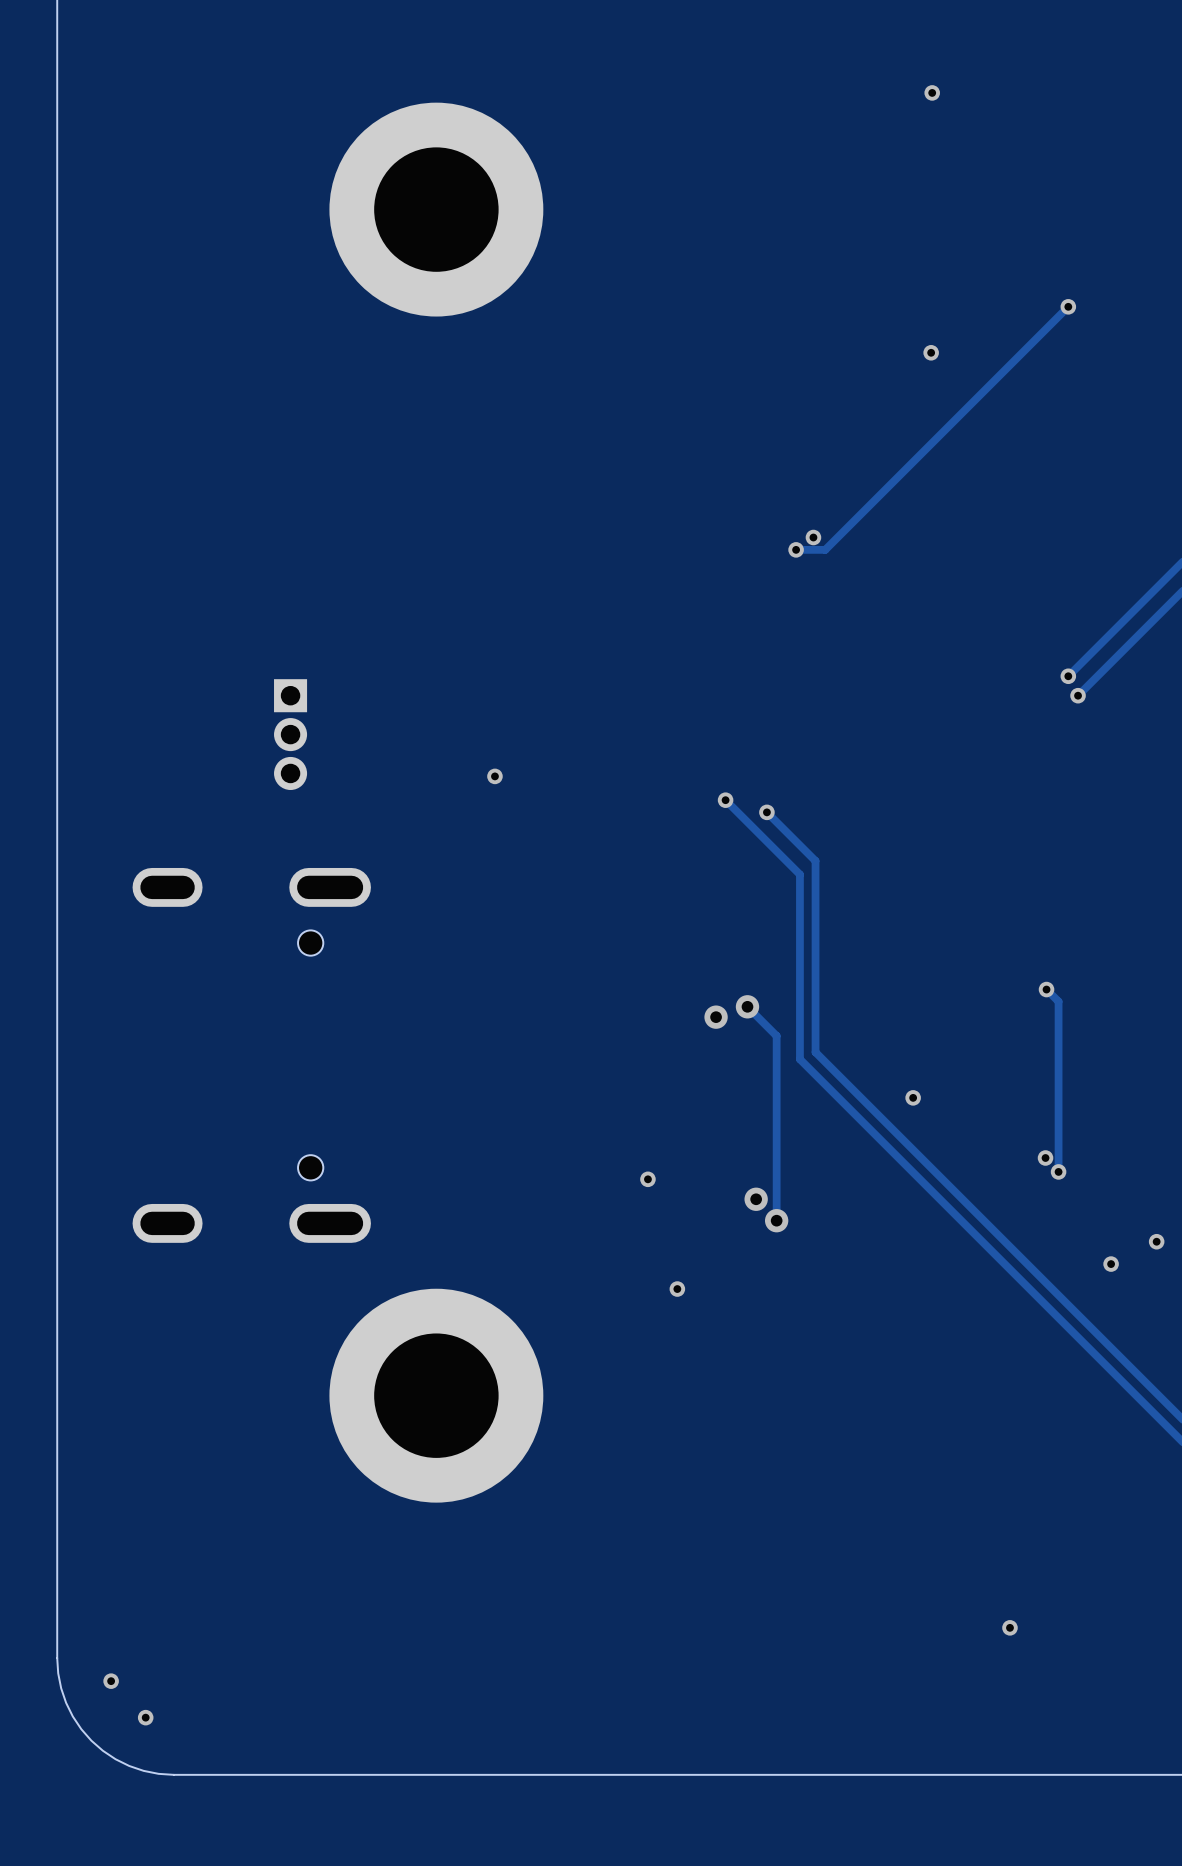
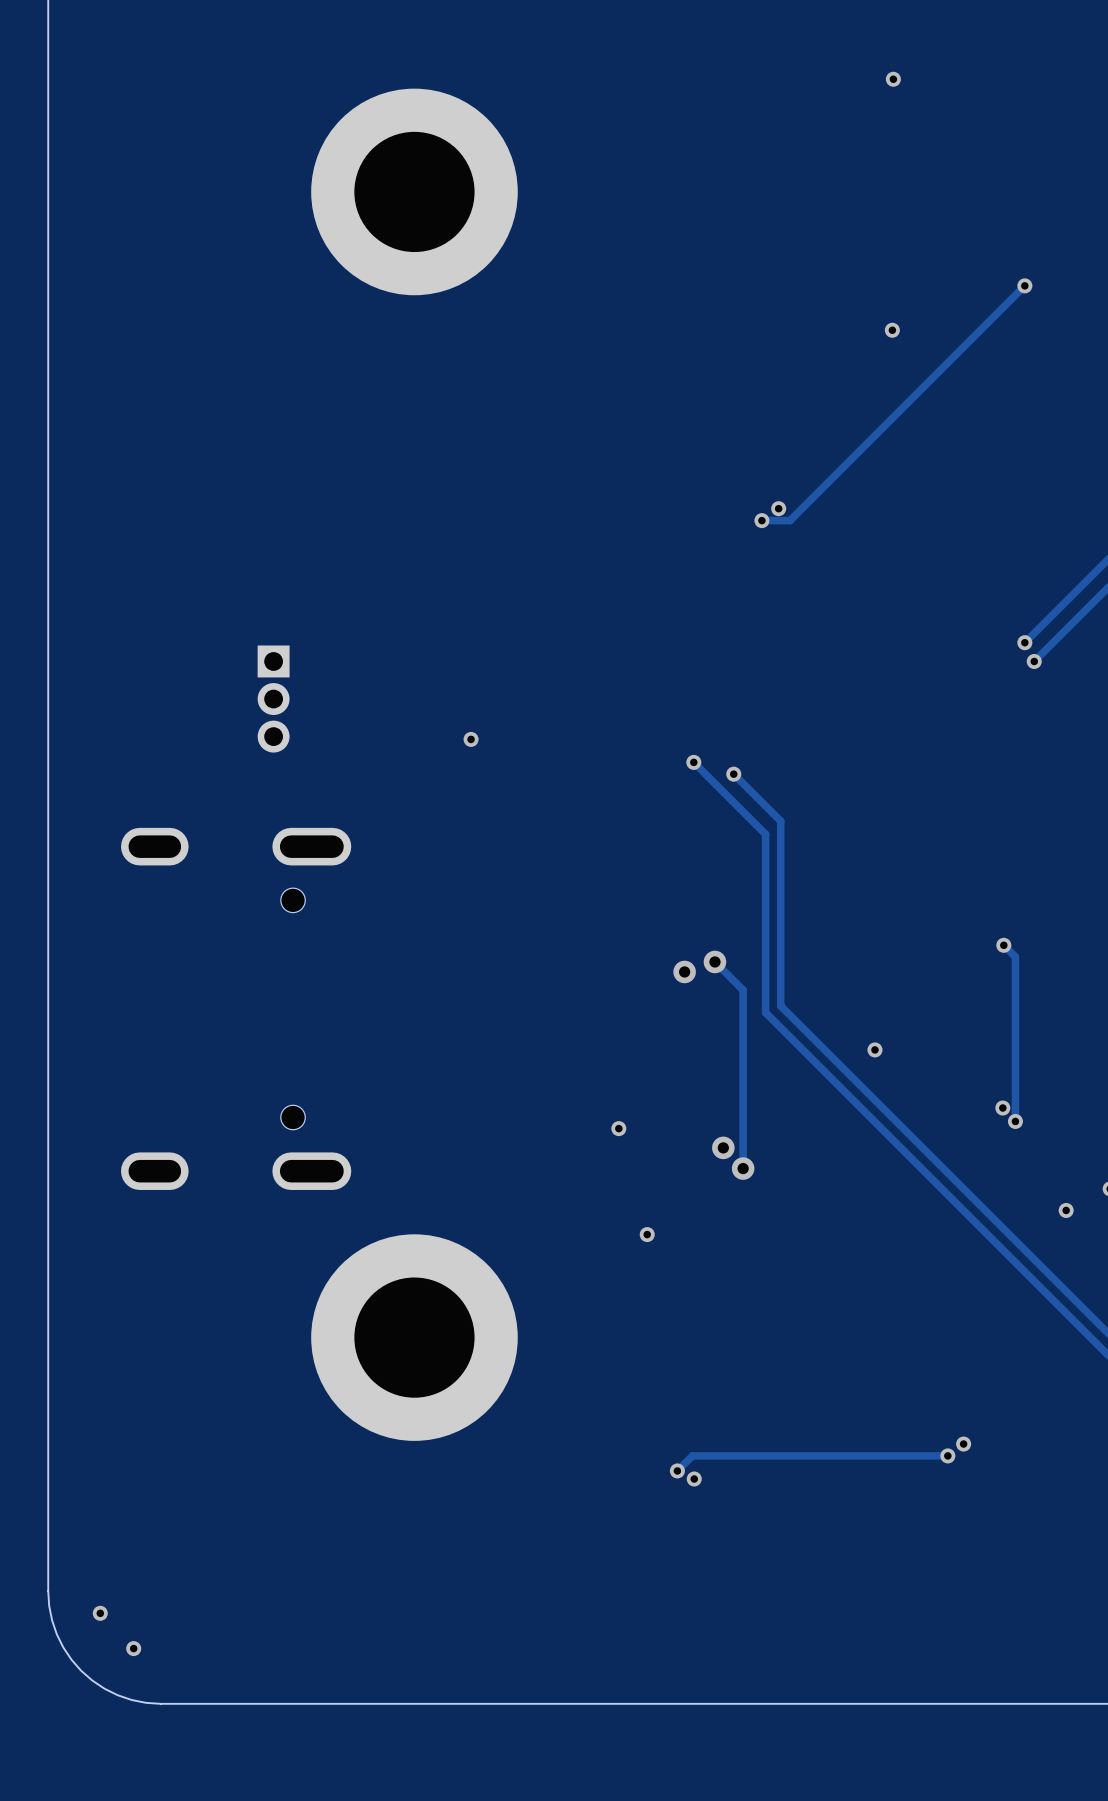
via: none -> (963, 1444)
track: none -> (947, 1455) (692, 1455) (677, 1470)
via: none -> (947, 1455)
via: none -> (677, 1470)
via: none -> (694, 1479)
via: (1009, 1627) -> none

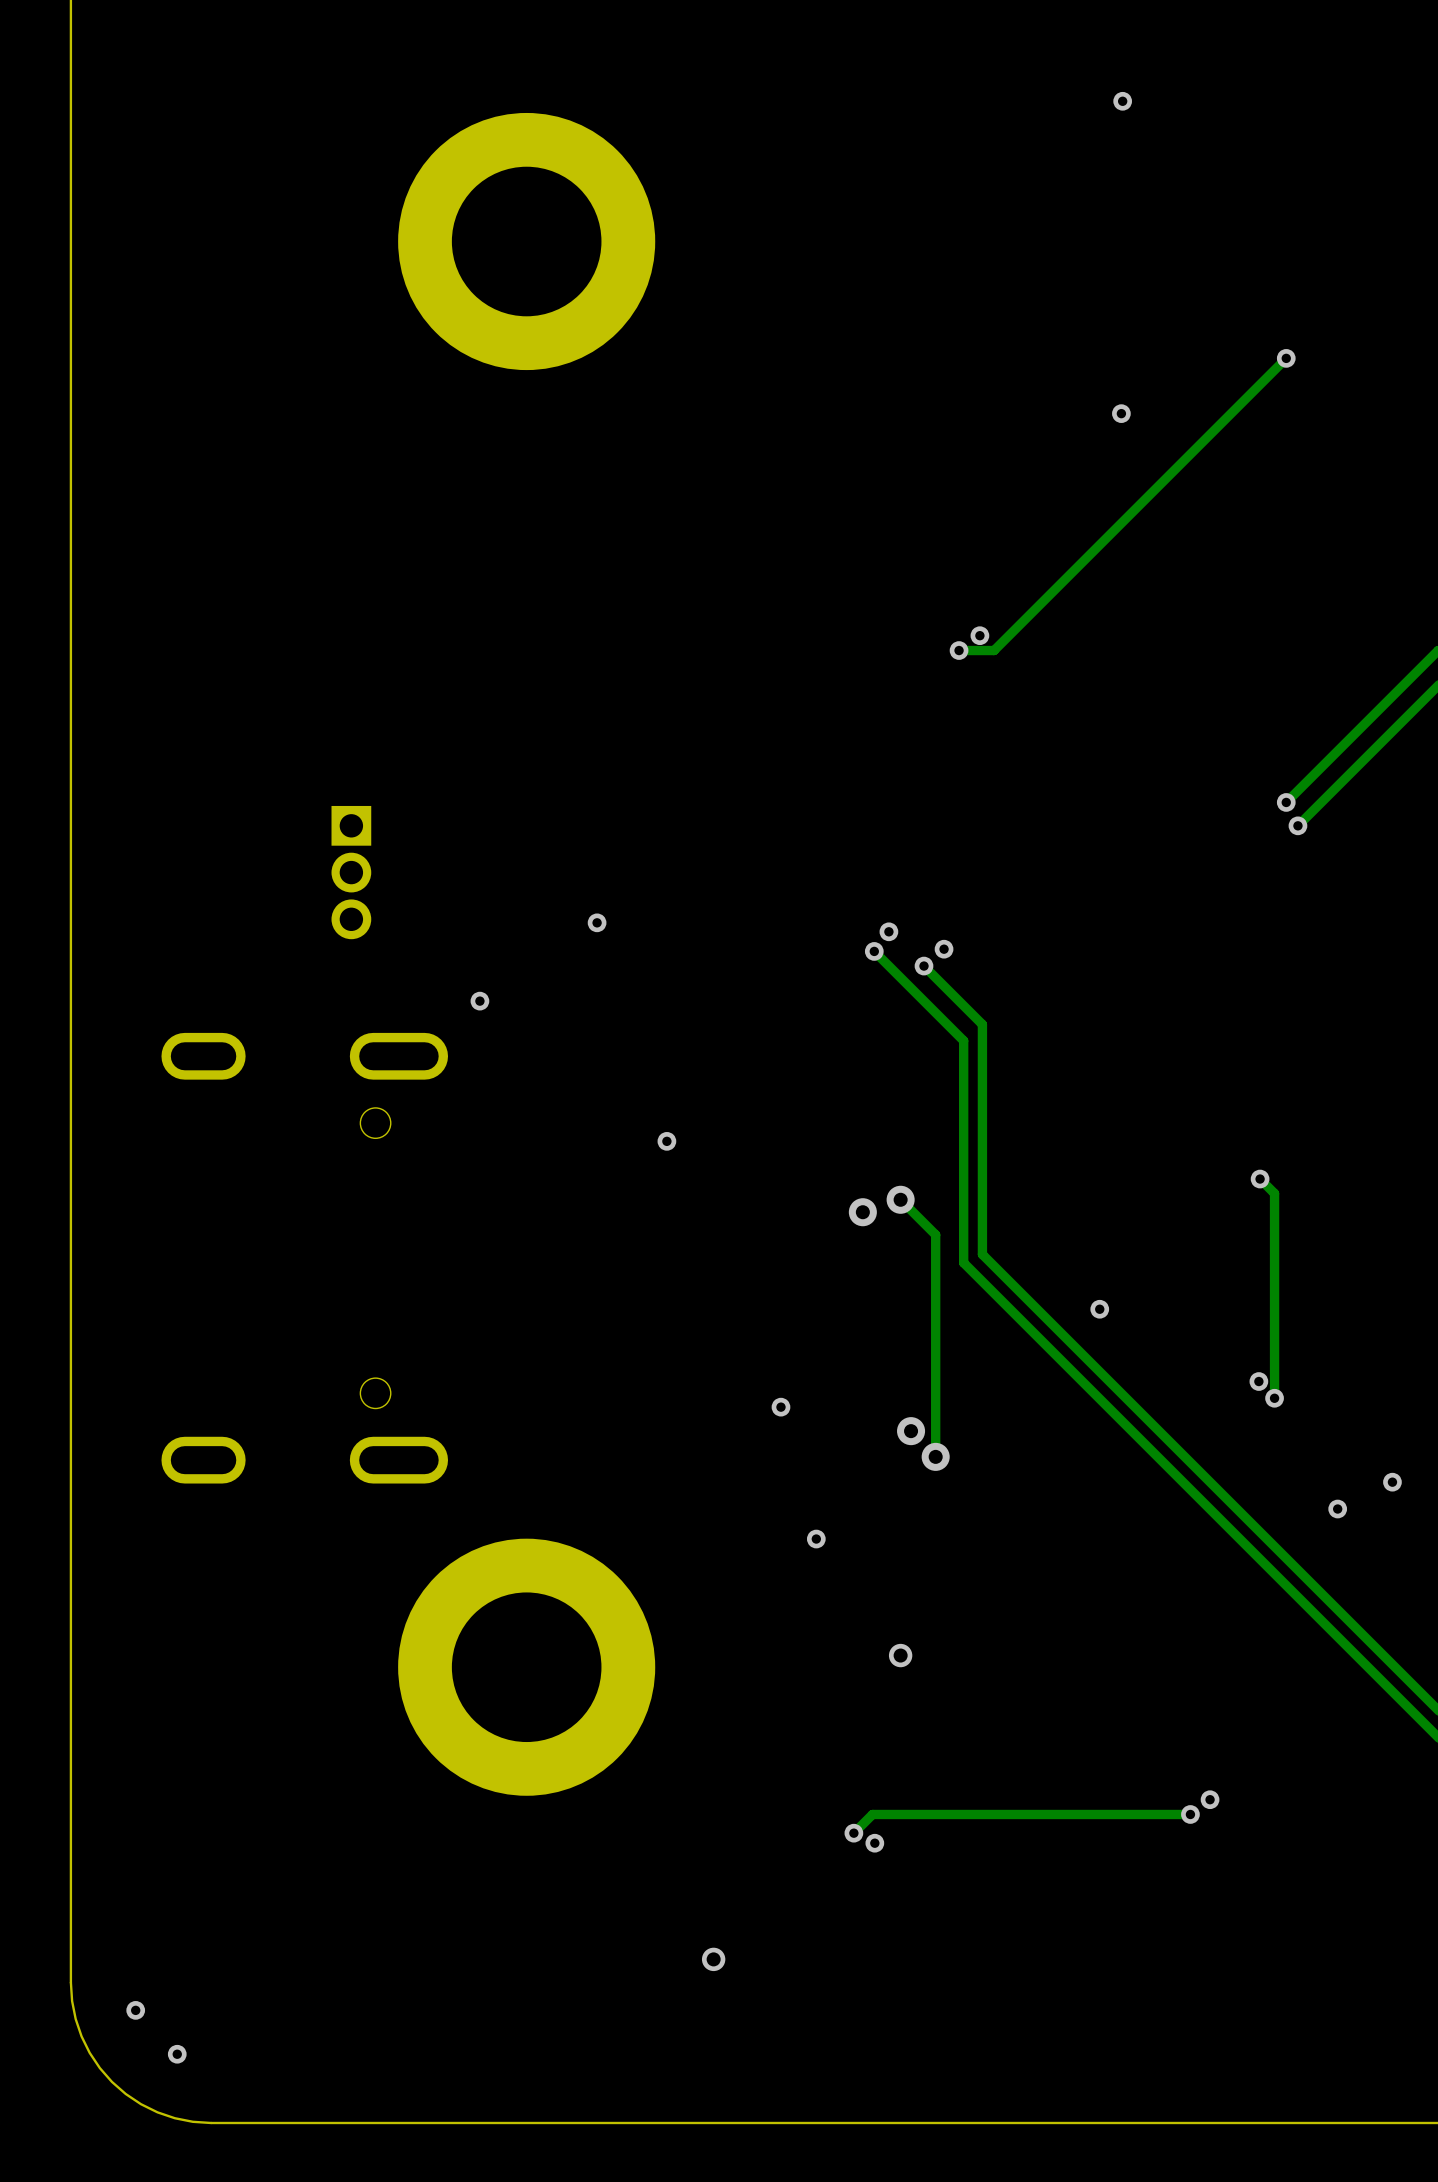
via: none -> (888, 931)
via: none -> (944, 949)
via: none -> (479, 1001)
via: none -> (666, 1141)
via: none -> (900, 1655)
via: none -> (713, 1959)

